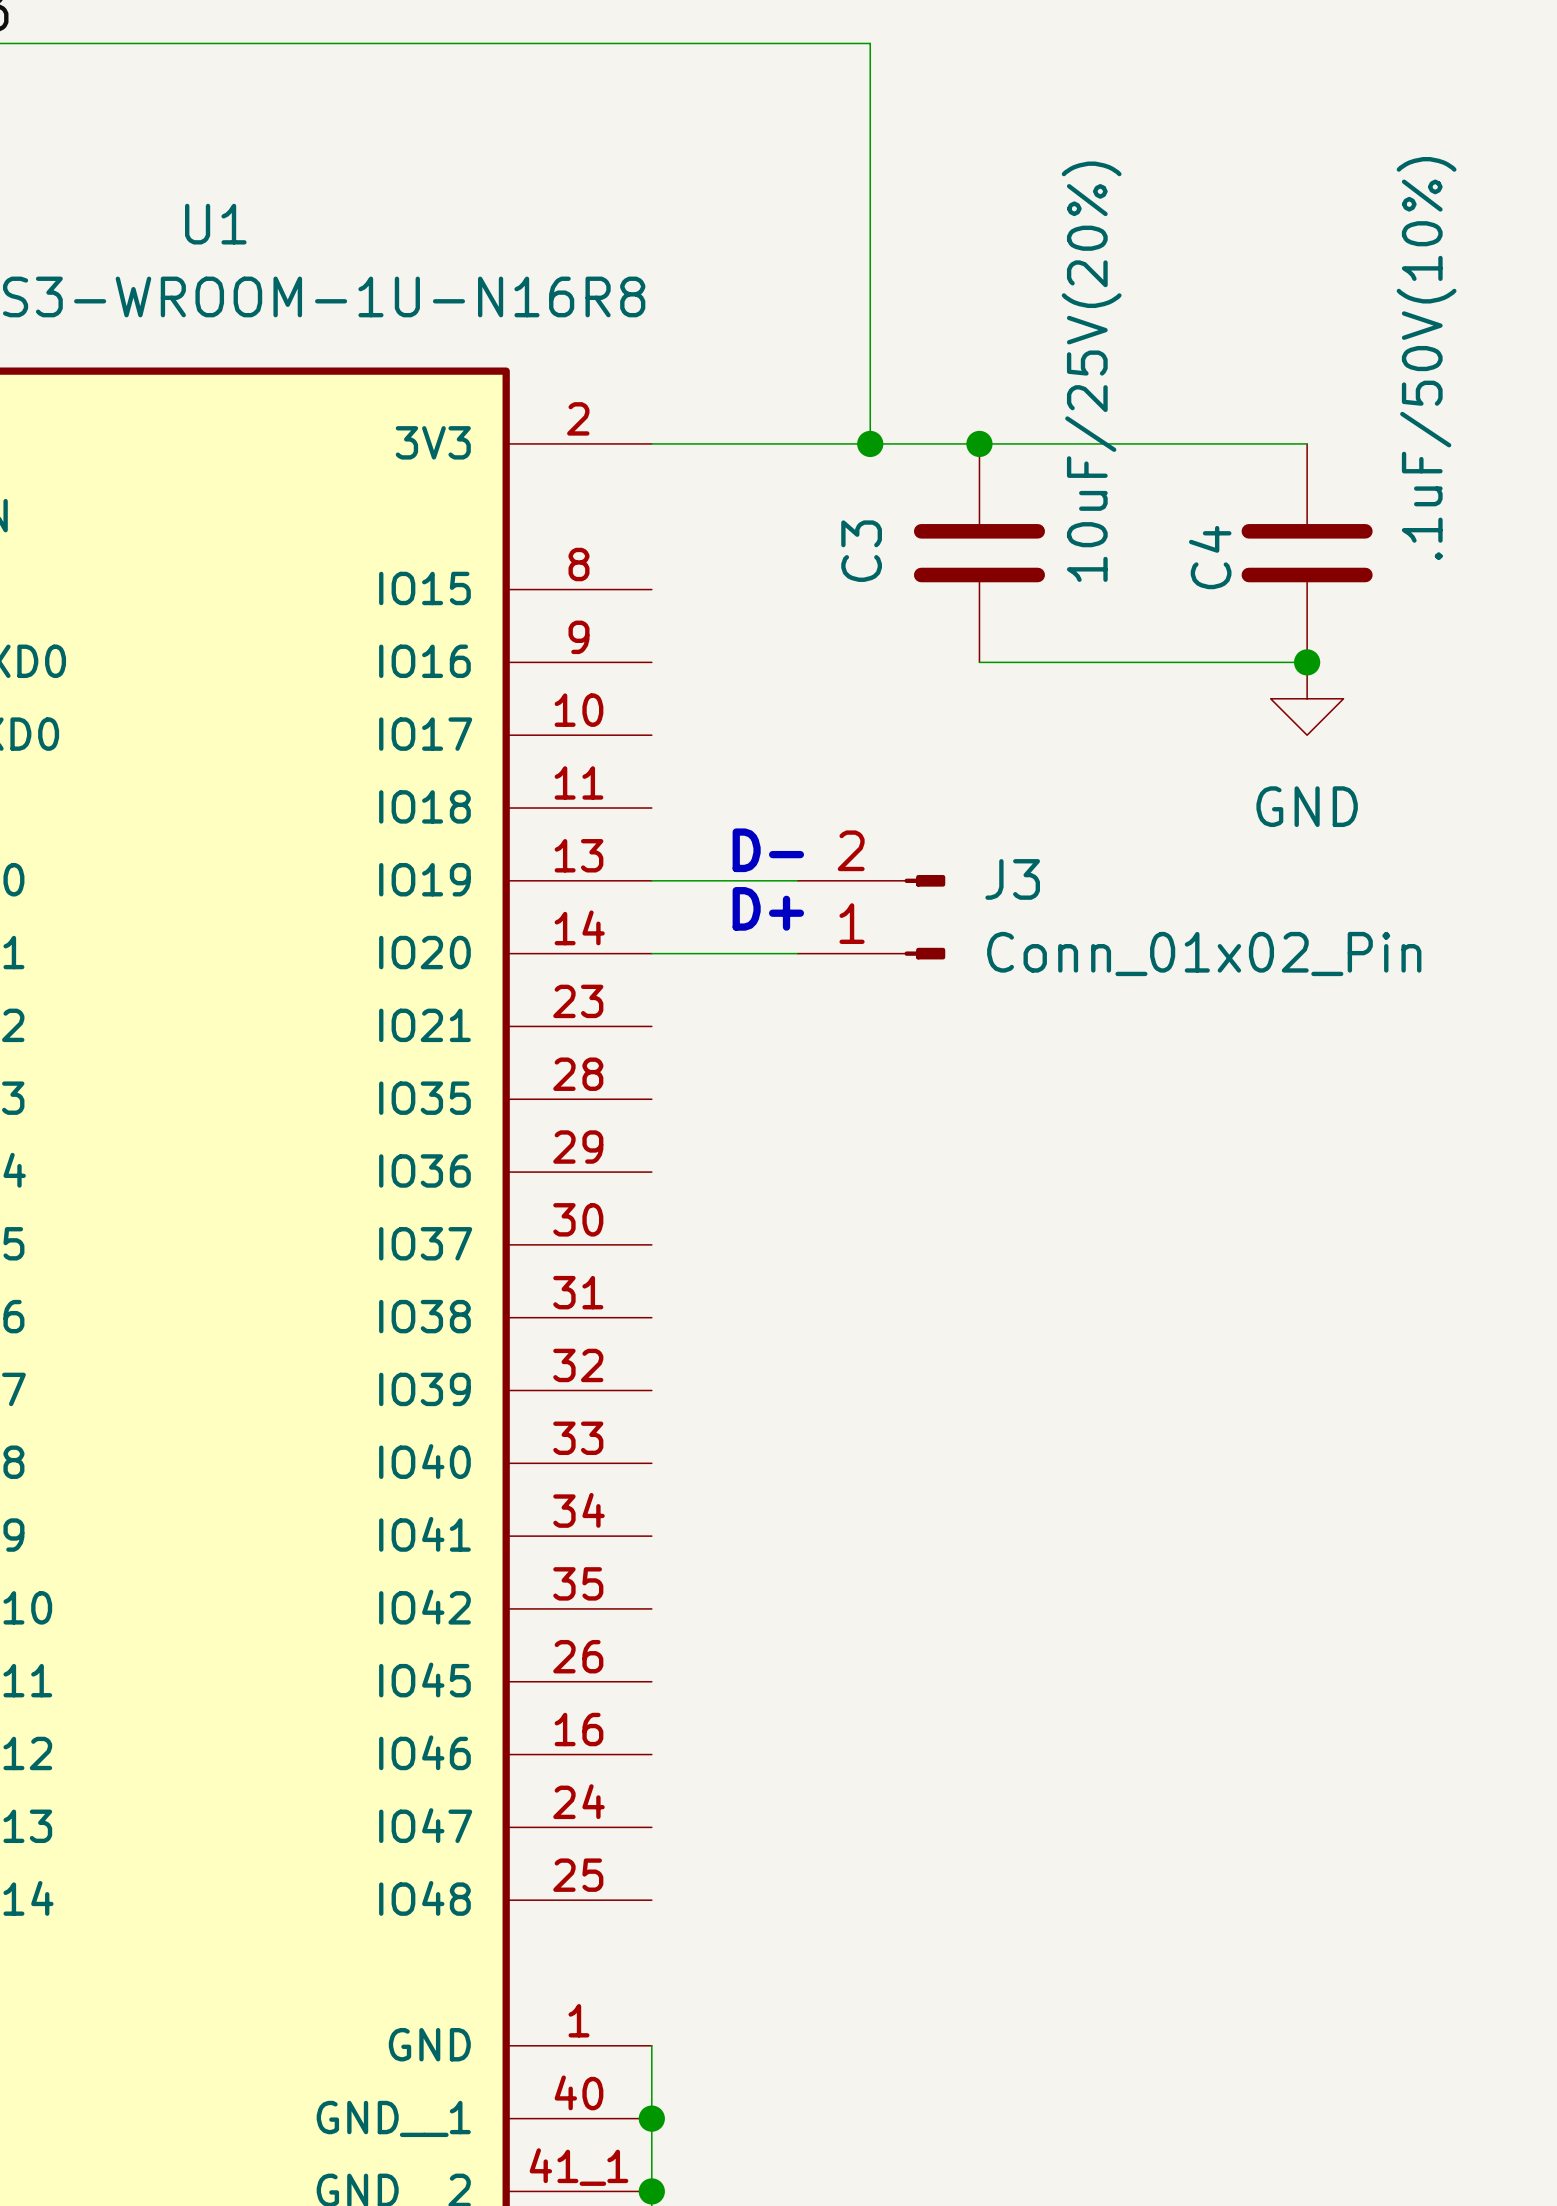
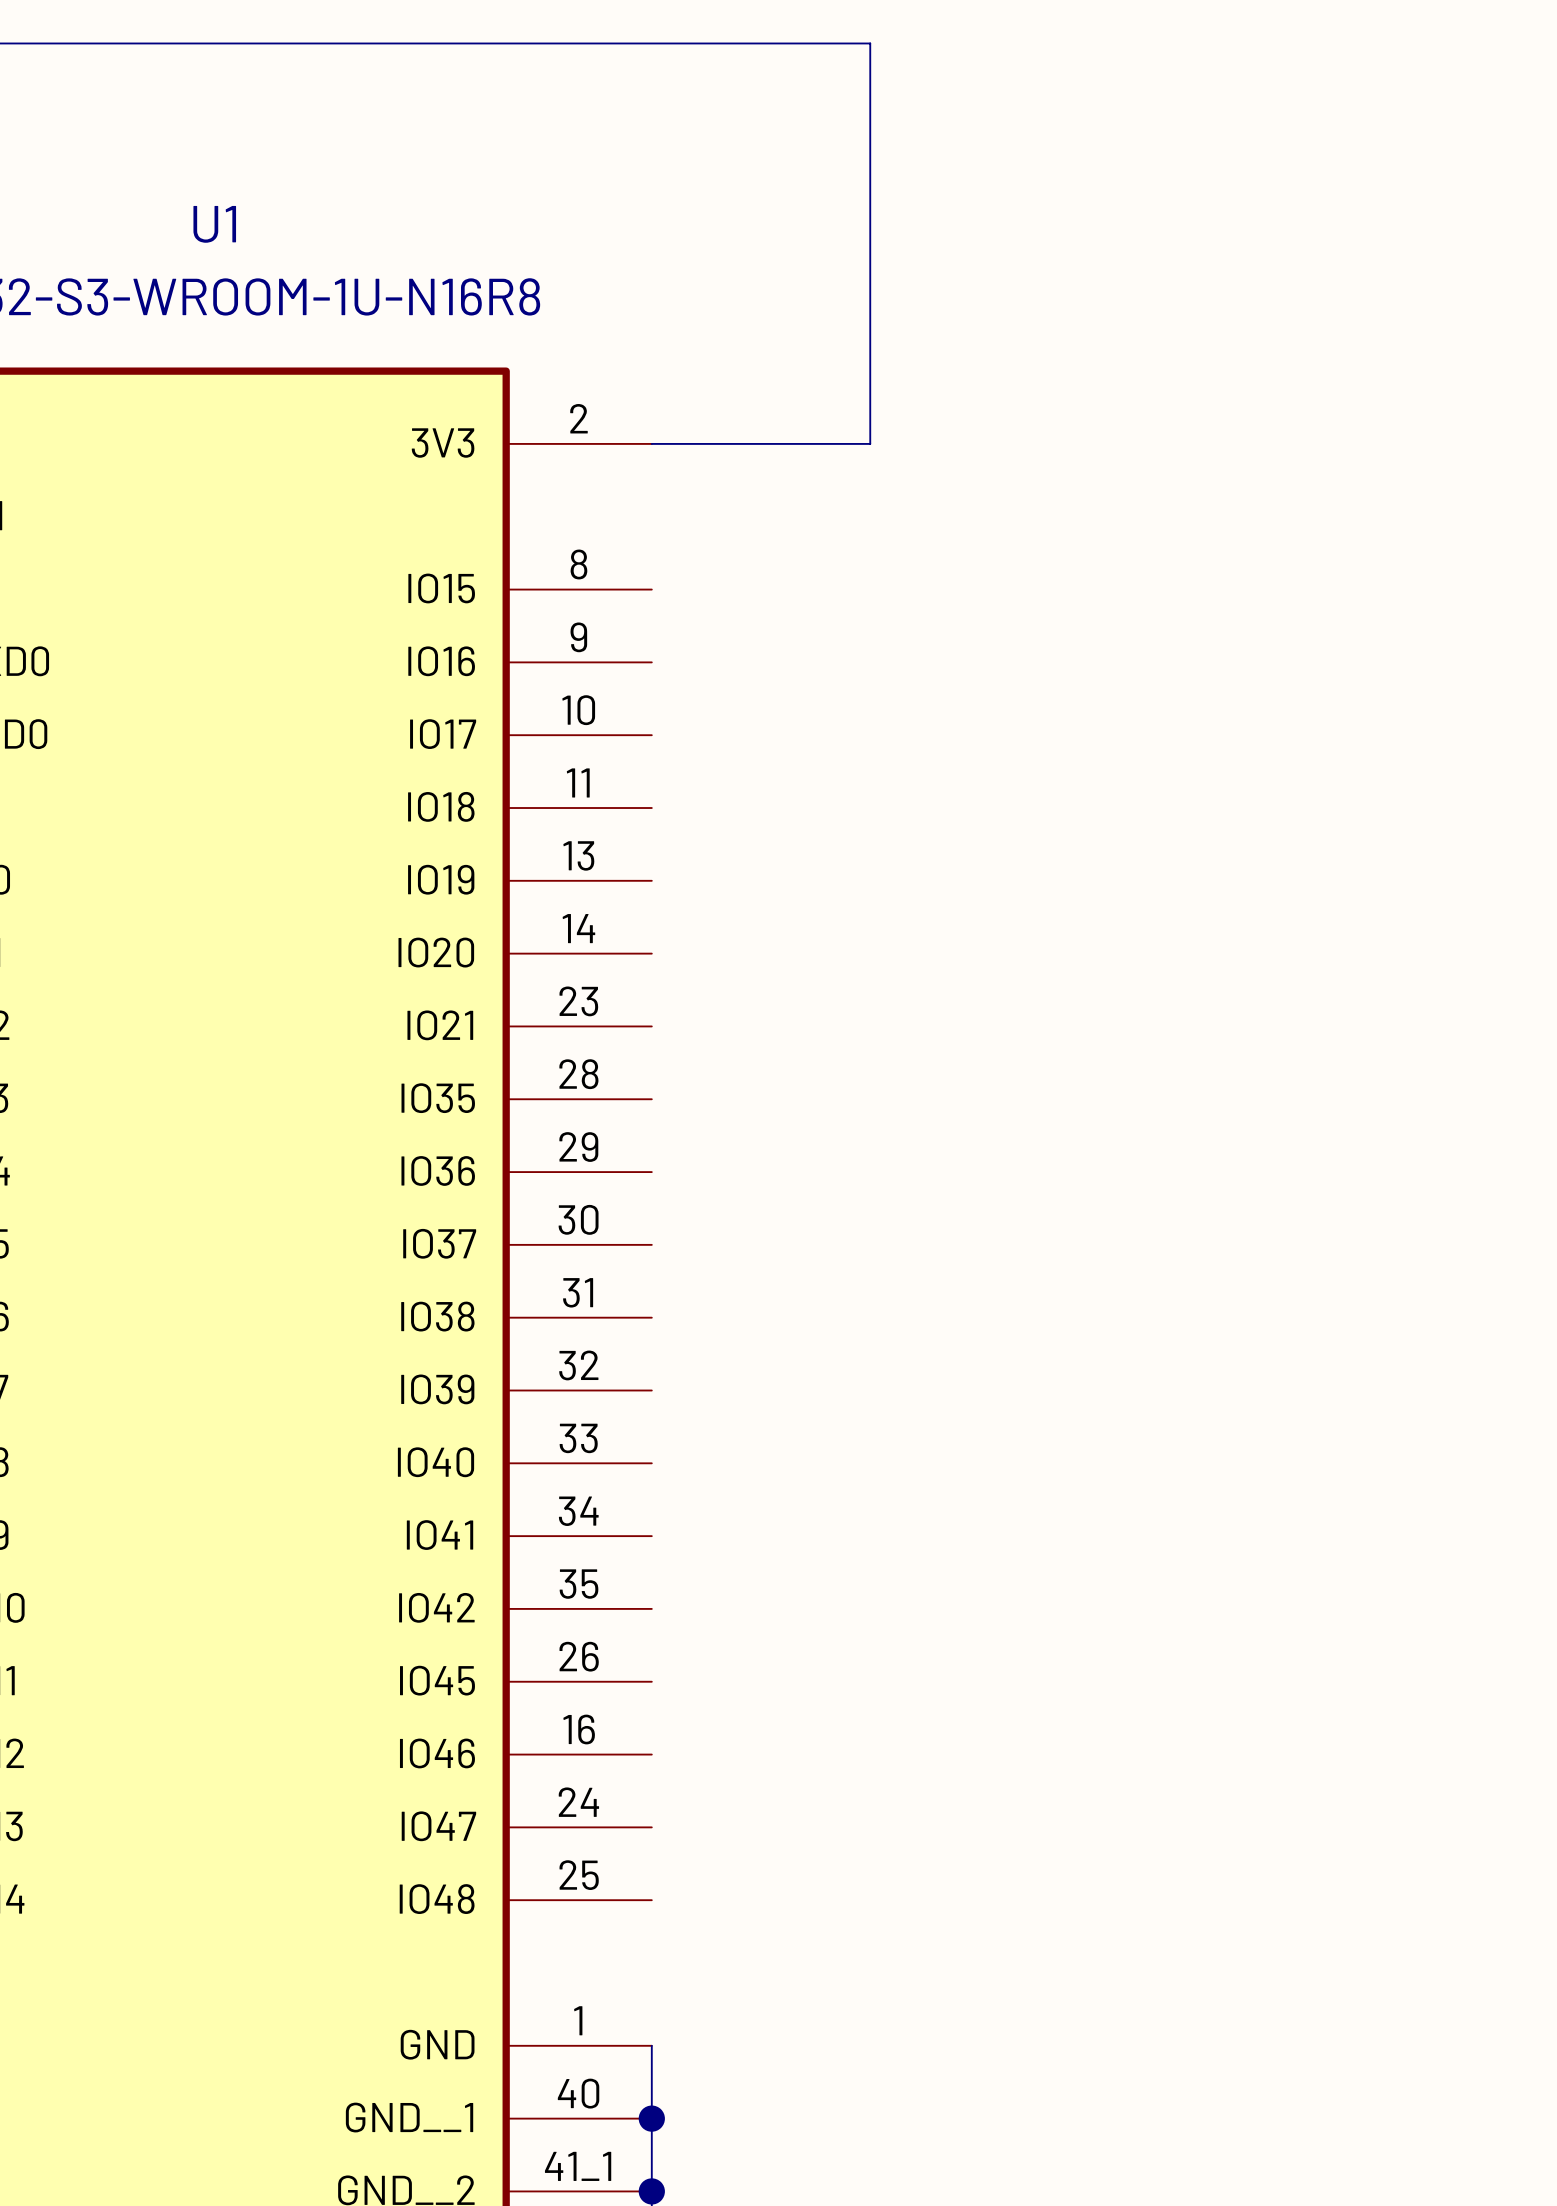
wire: (870, 443) (1307, 443) -> none
junction: (870, 443) -> none
junction: (979, 443) -> none
C3: 10uF/25V(20%) (979, 553) -> none
C4: .1uF/50V(10%) (1307, 553) -> none
wire: (979, 662) (1307, 662) -> none
junction: (1307, 662) -> none
power symbol: GND (1307, 698) -> none
text: D- (768, 850) -> none
wire: (651, 880) (797, 880) -> none
text: D+ (768, 908) -> none
J3: Conn_01x02_Pin (871, 917) -> none
wire: (651, 953) (797, 953) -> none

